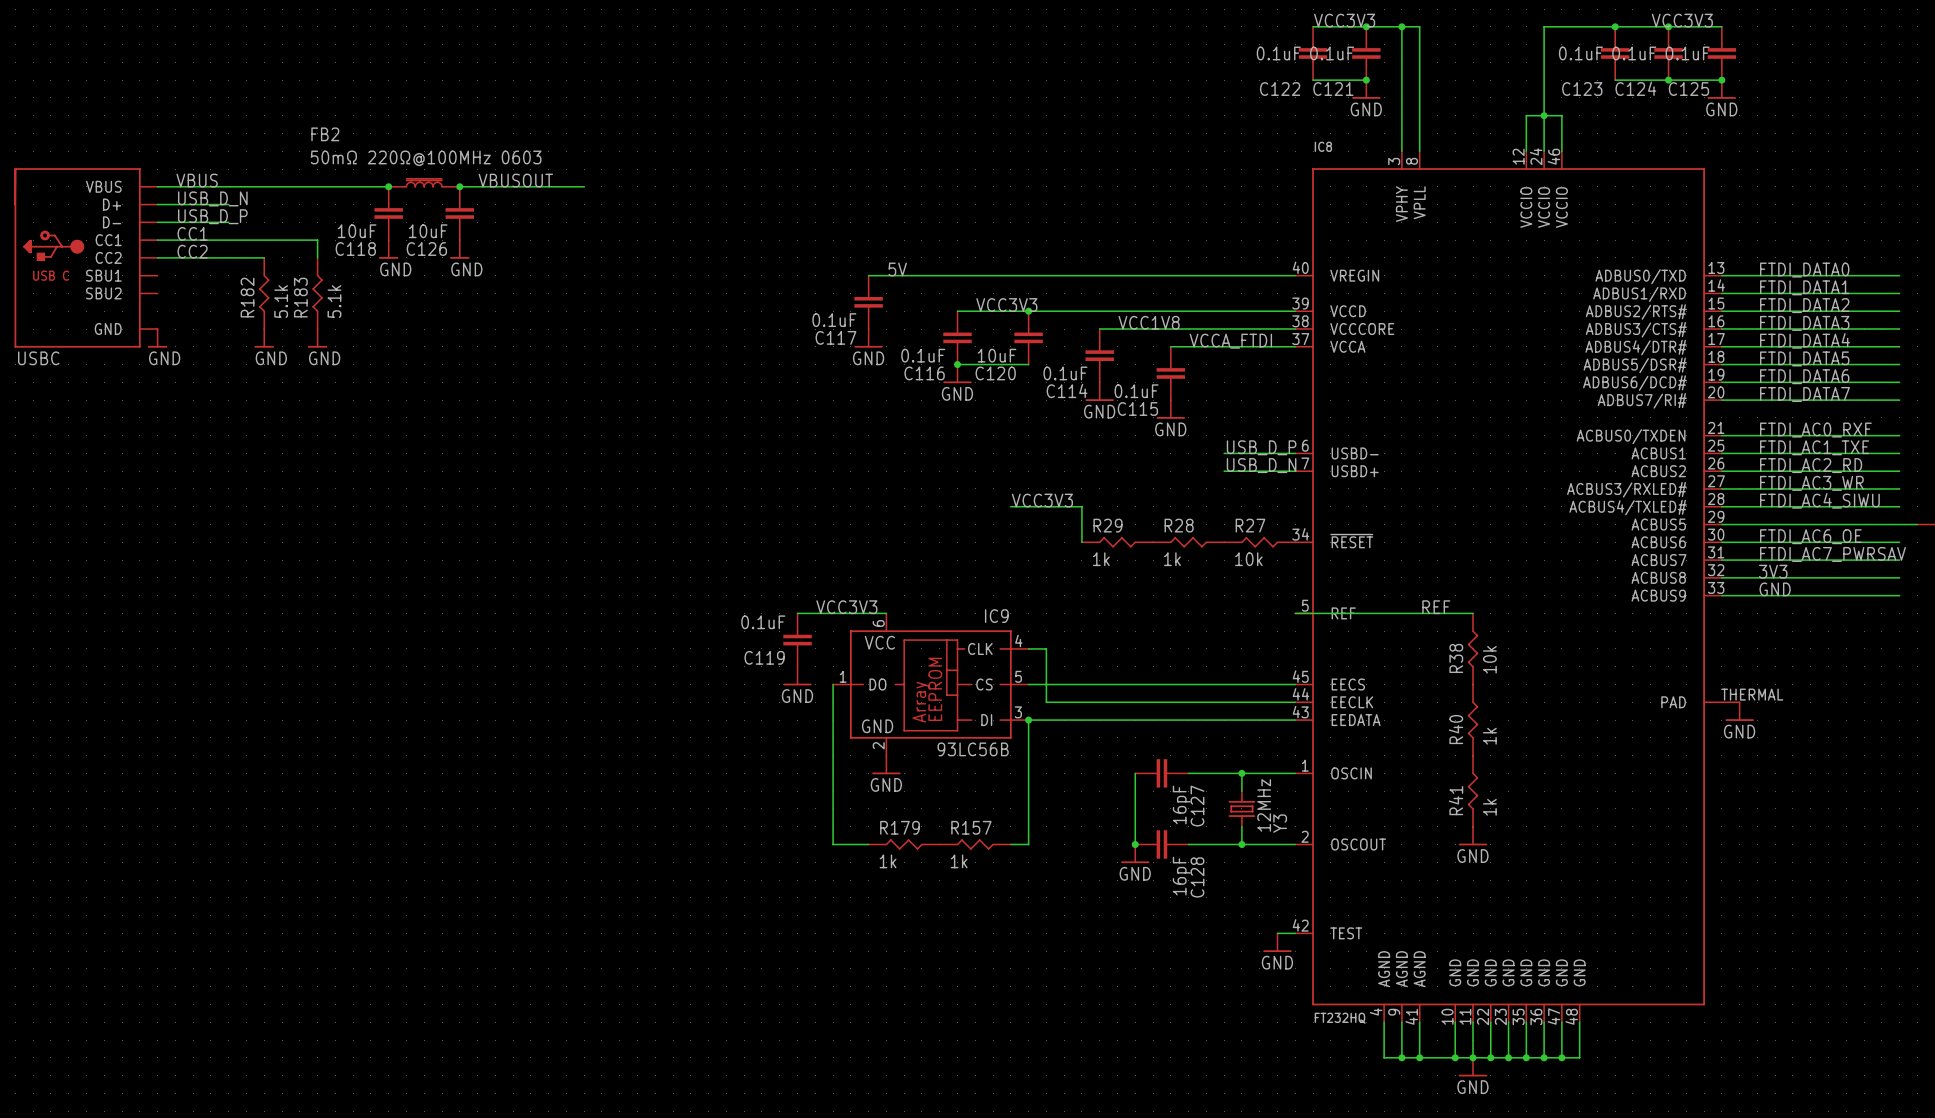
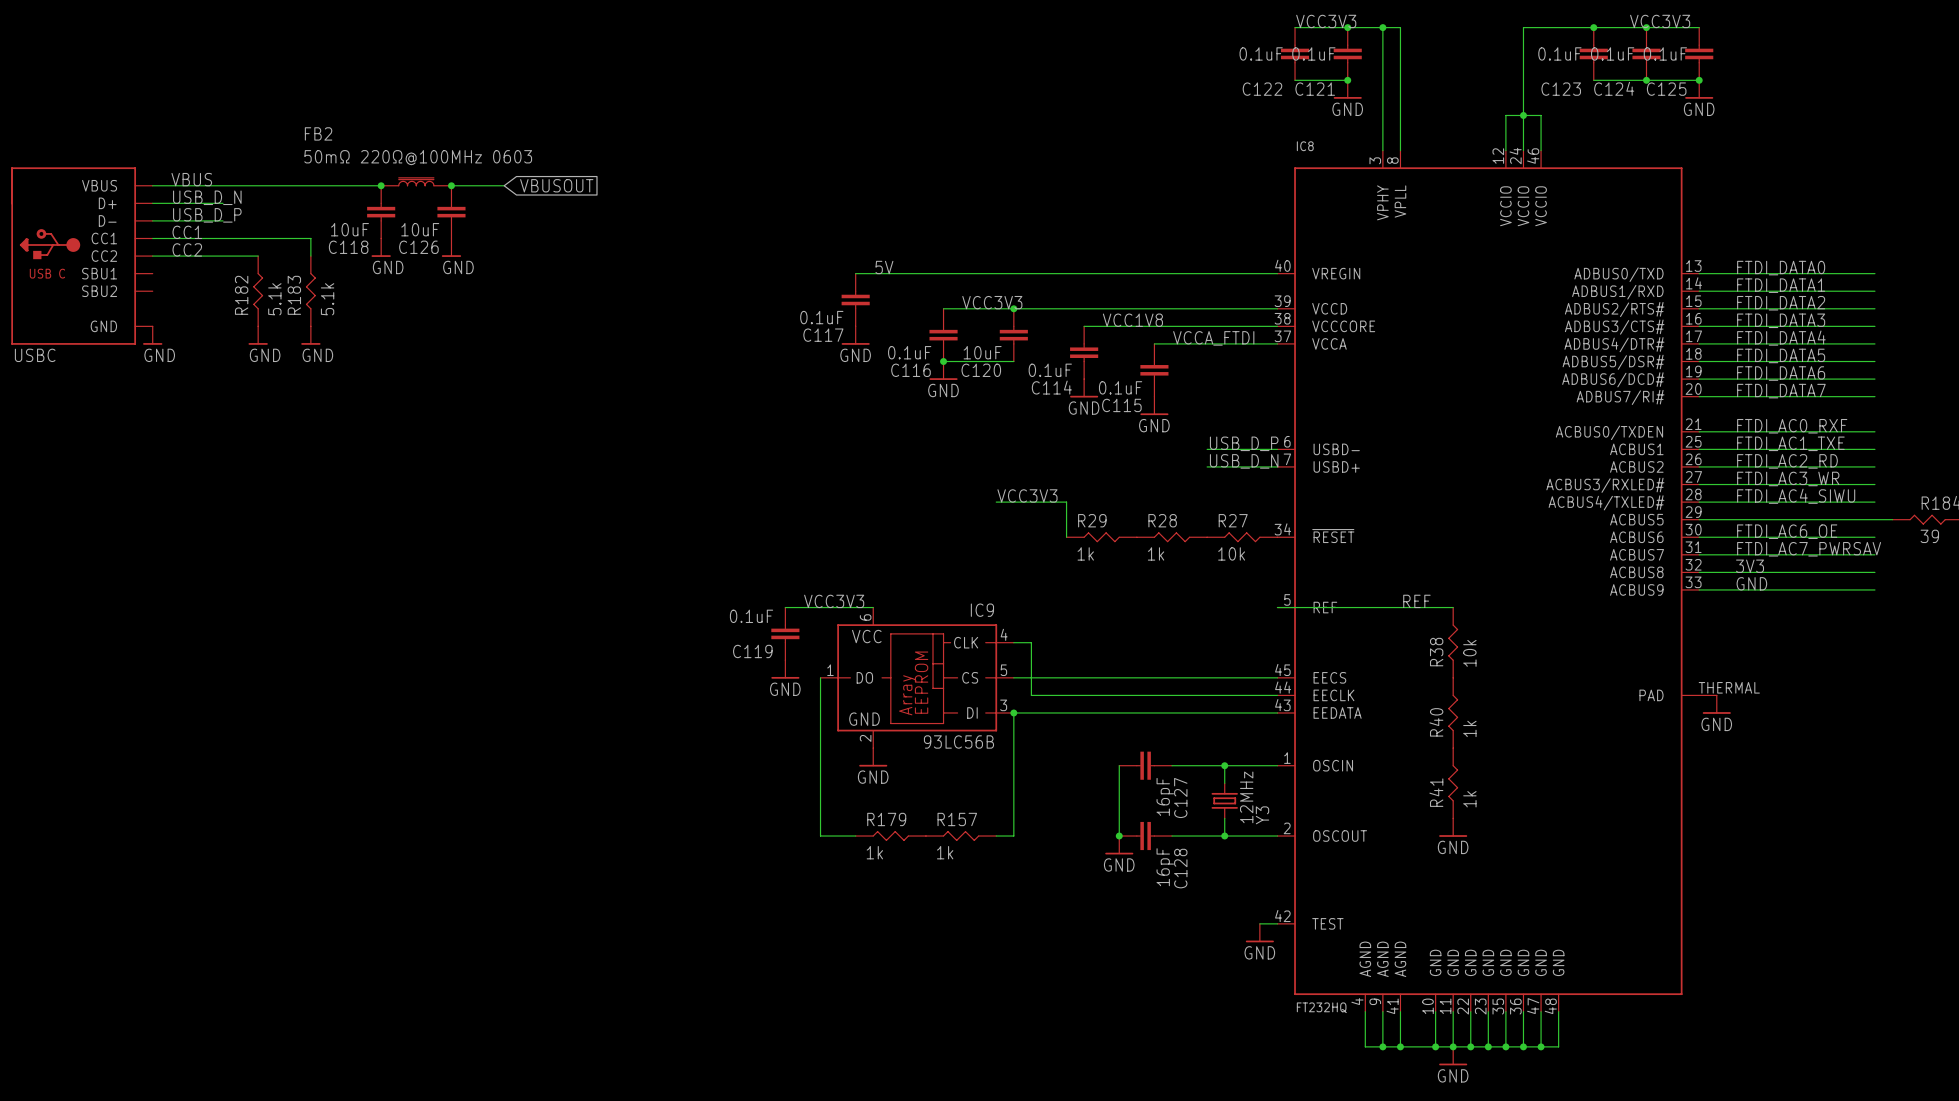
label: VBUSOUT (515, 180) -> none
wire: (513, 186) (584, 186) -> none
global label: none -> VBUSOUT (556, 185)

